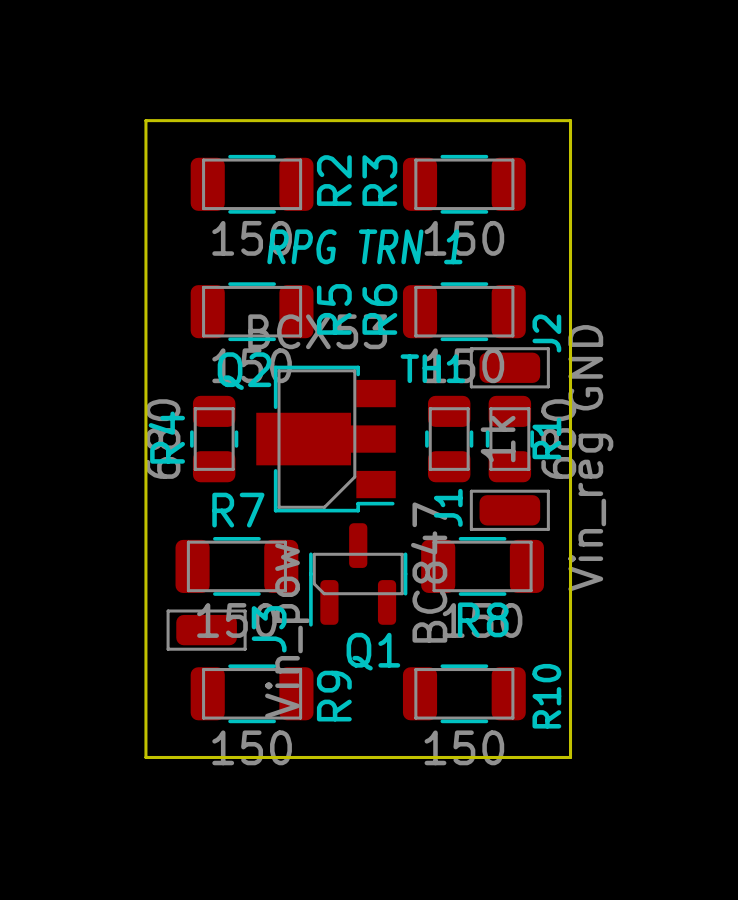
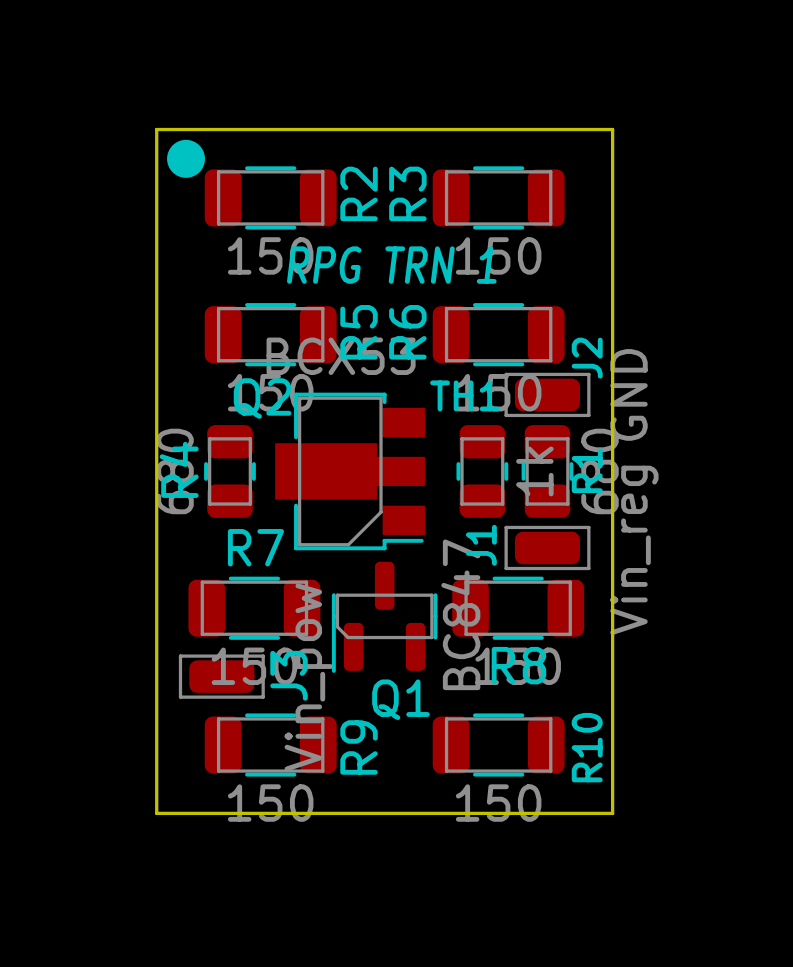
drawing: none -> [167, 139, 206, 178]

